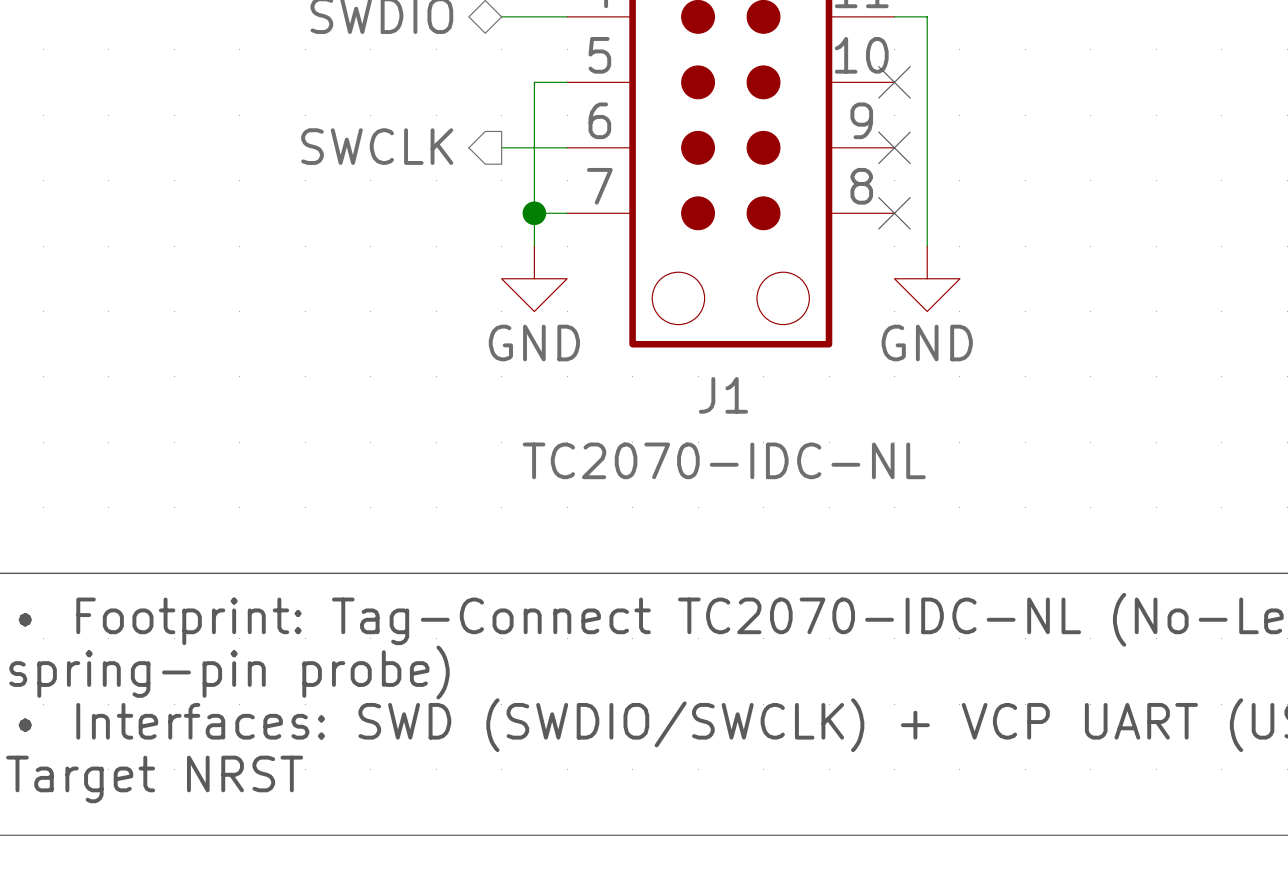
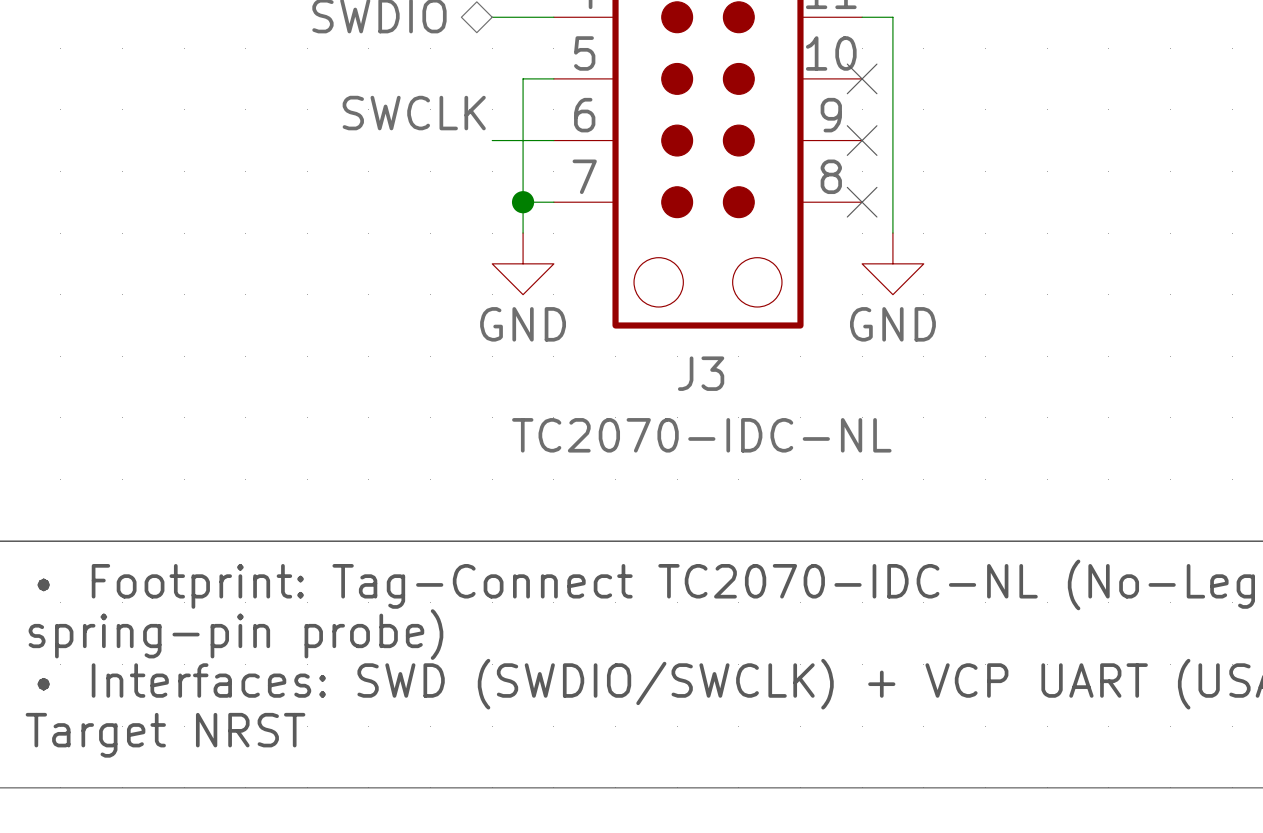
label: none -> SWCLK (414, 113)
hierarchical label: SWCLK (377, 146) -> none
J1 name: J1 (723, 395) -> J3 (701, 373)

